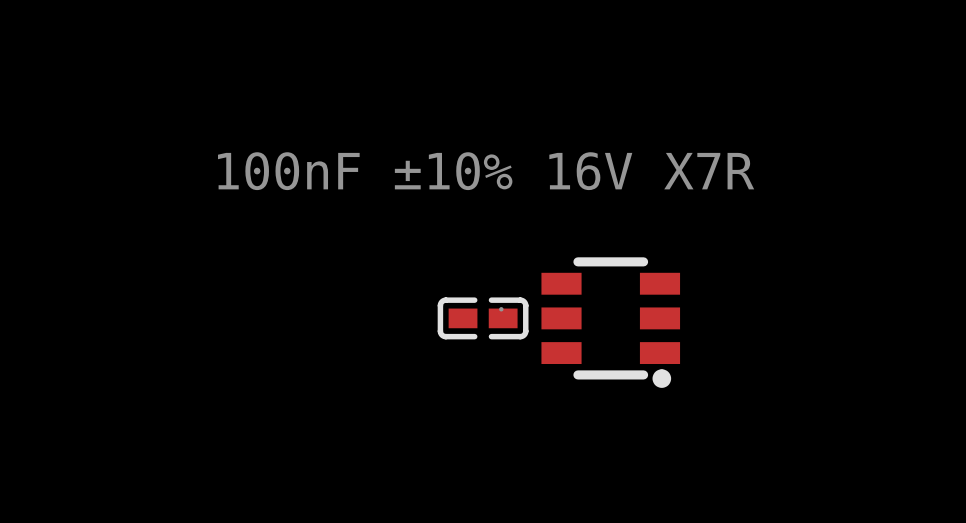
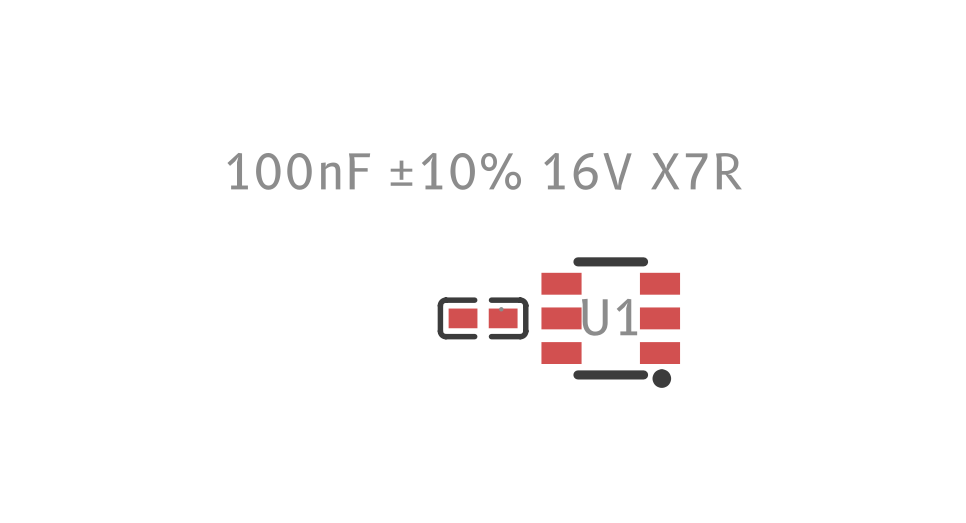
U1 name: none -> U1 (609, 317)

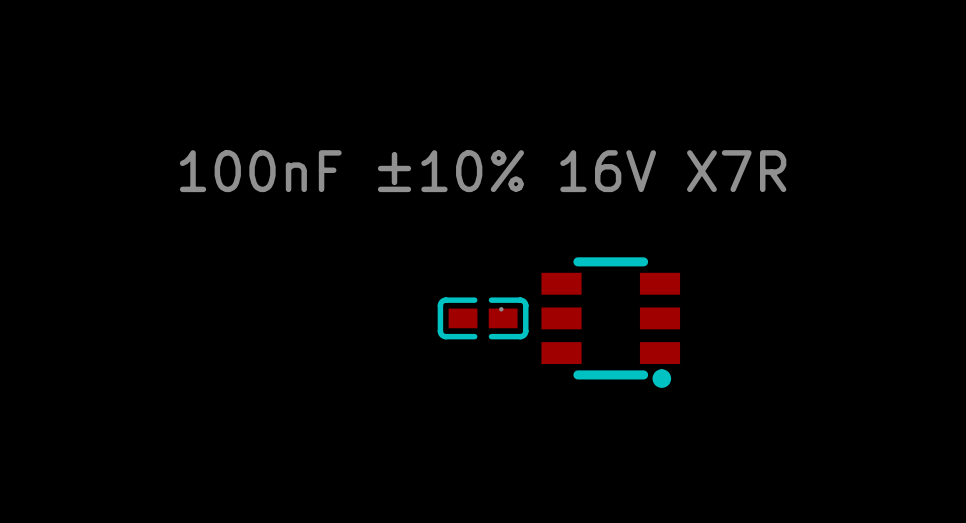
U1 name: U1 (609, 317) -> none

